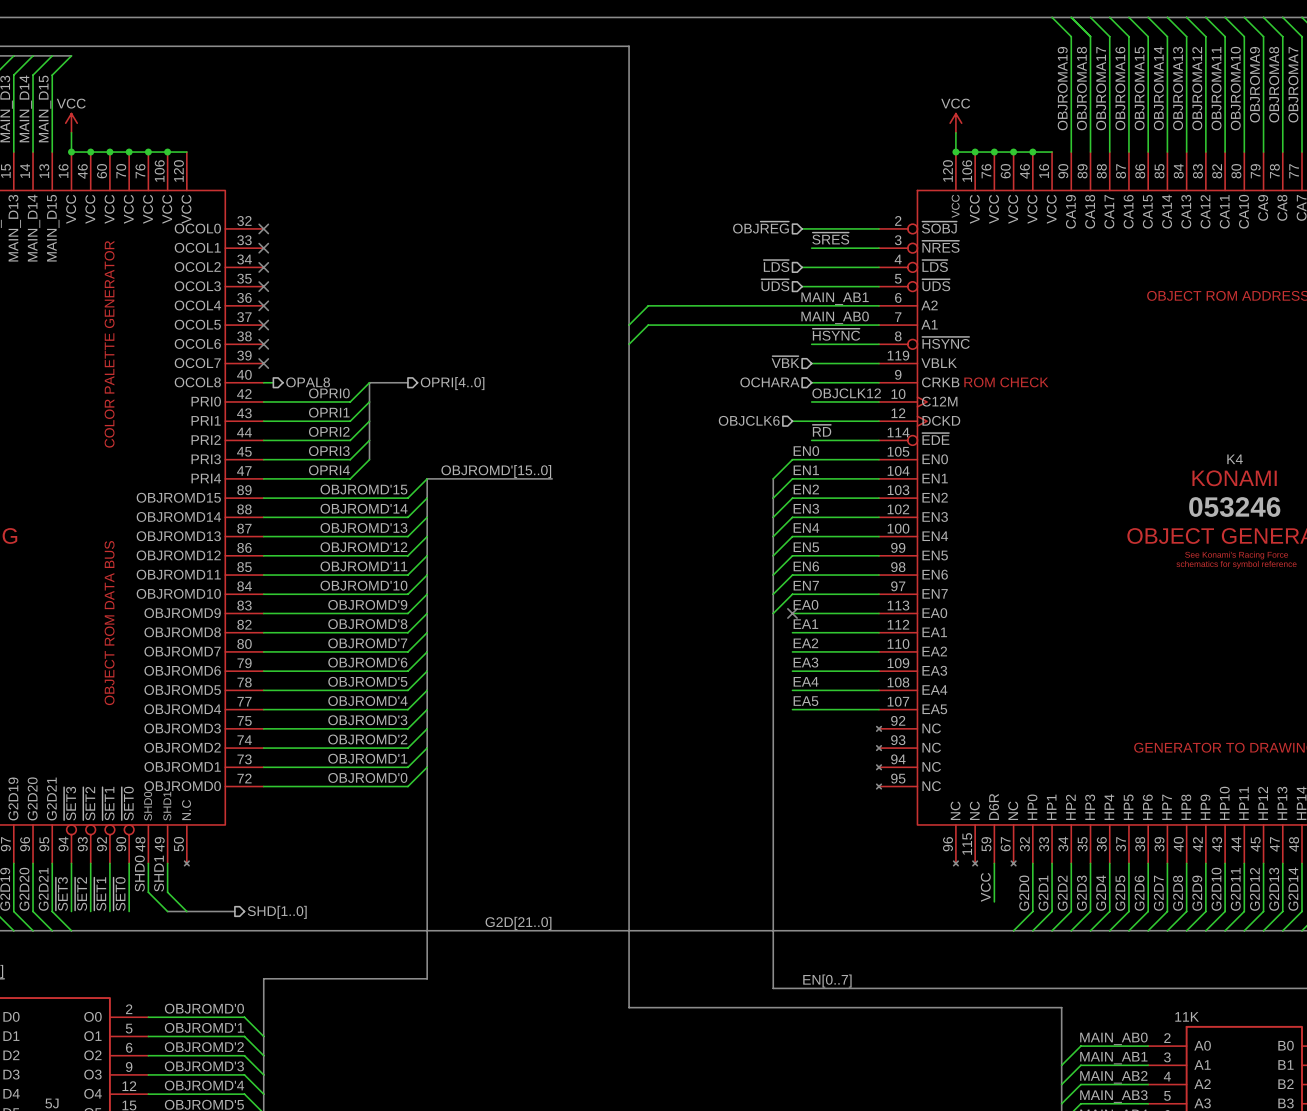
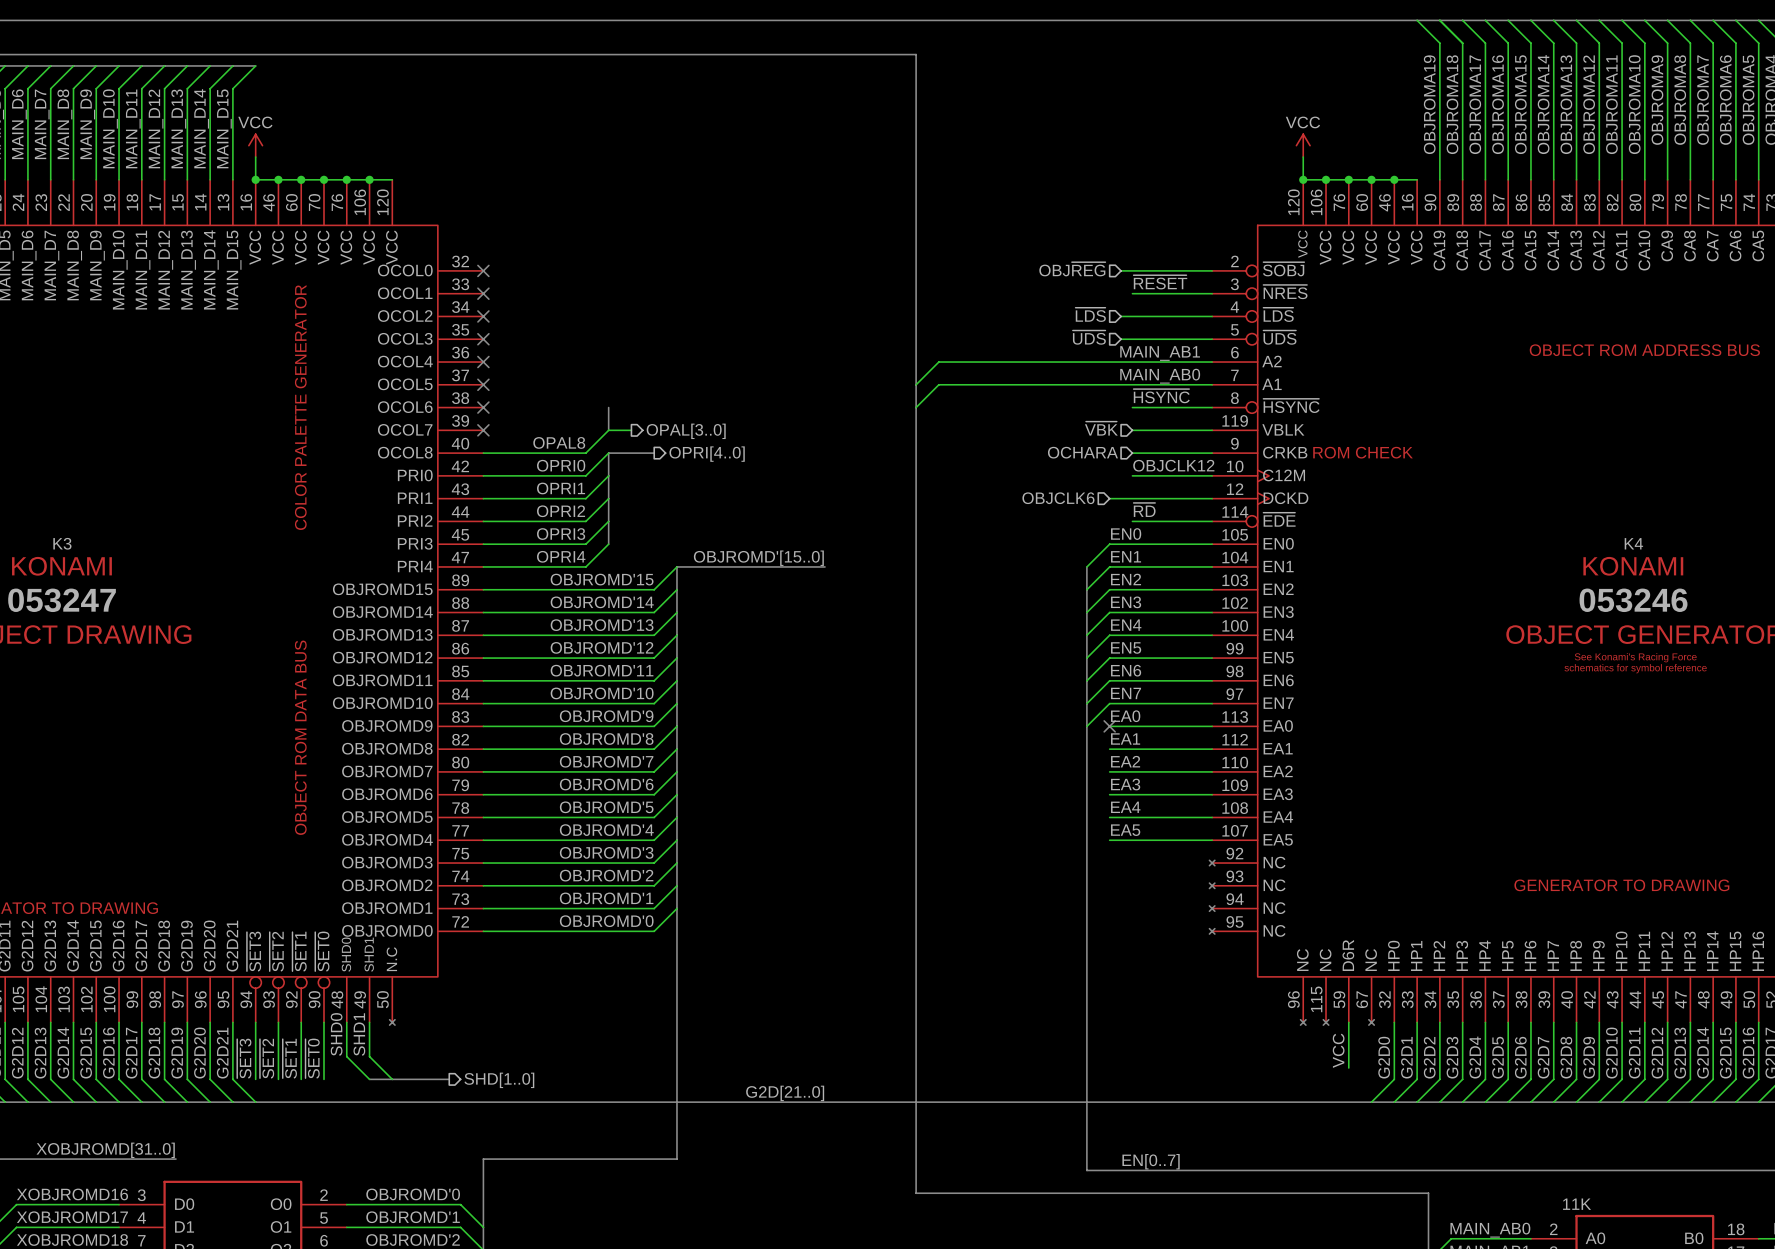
label: ~{SRES} (830, 238) -> ~{RESET} (1160, 282)
bus: none -> (608, 407) (608, 430)
wire: none -> (631, 430) (608, 430) (585, 453) (494, 453)
hierarchical label: none -> OPAL[3..0] (686, 431)
label: none -> OPAL8 (559, 442)
hierarchical label: OPAL8 (308, 382) -> none

